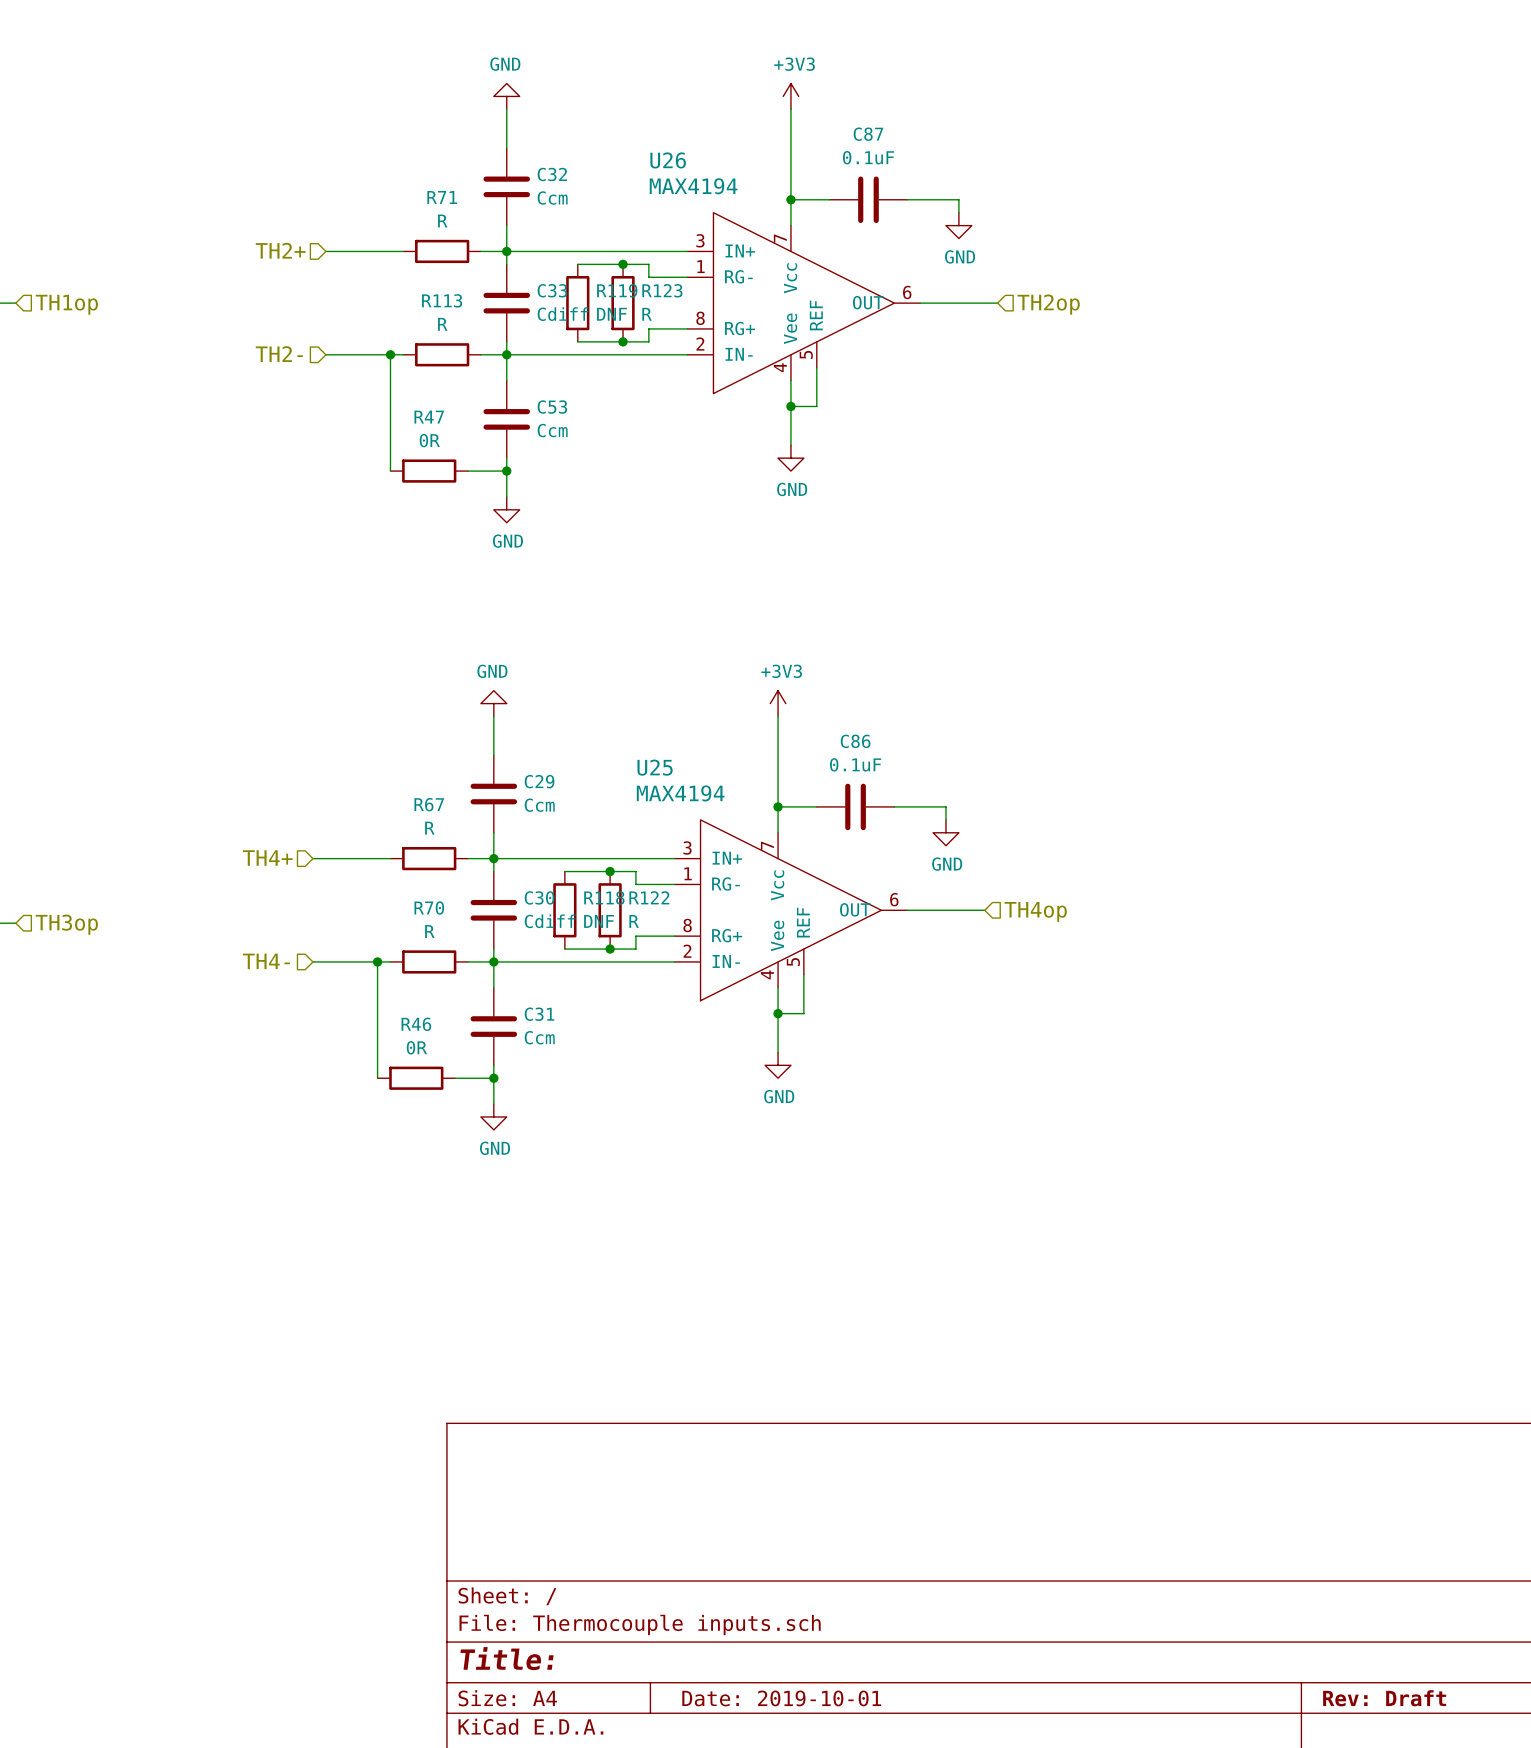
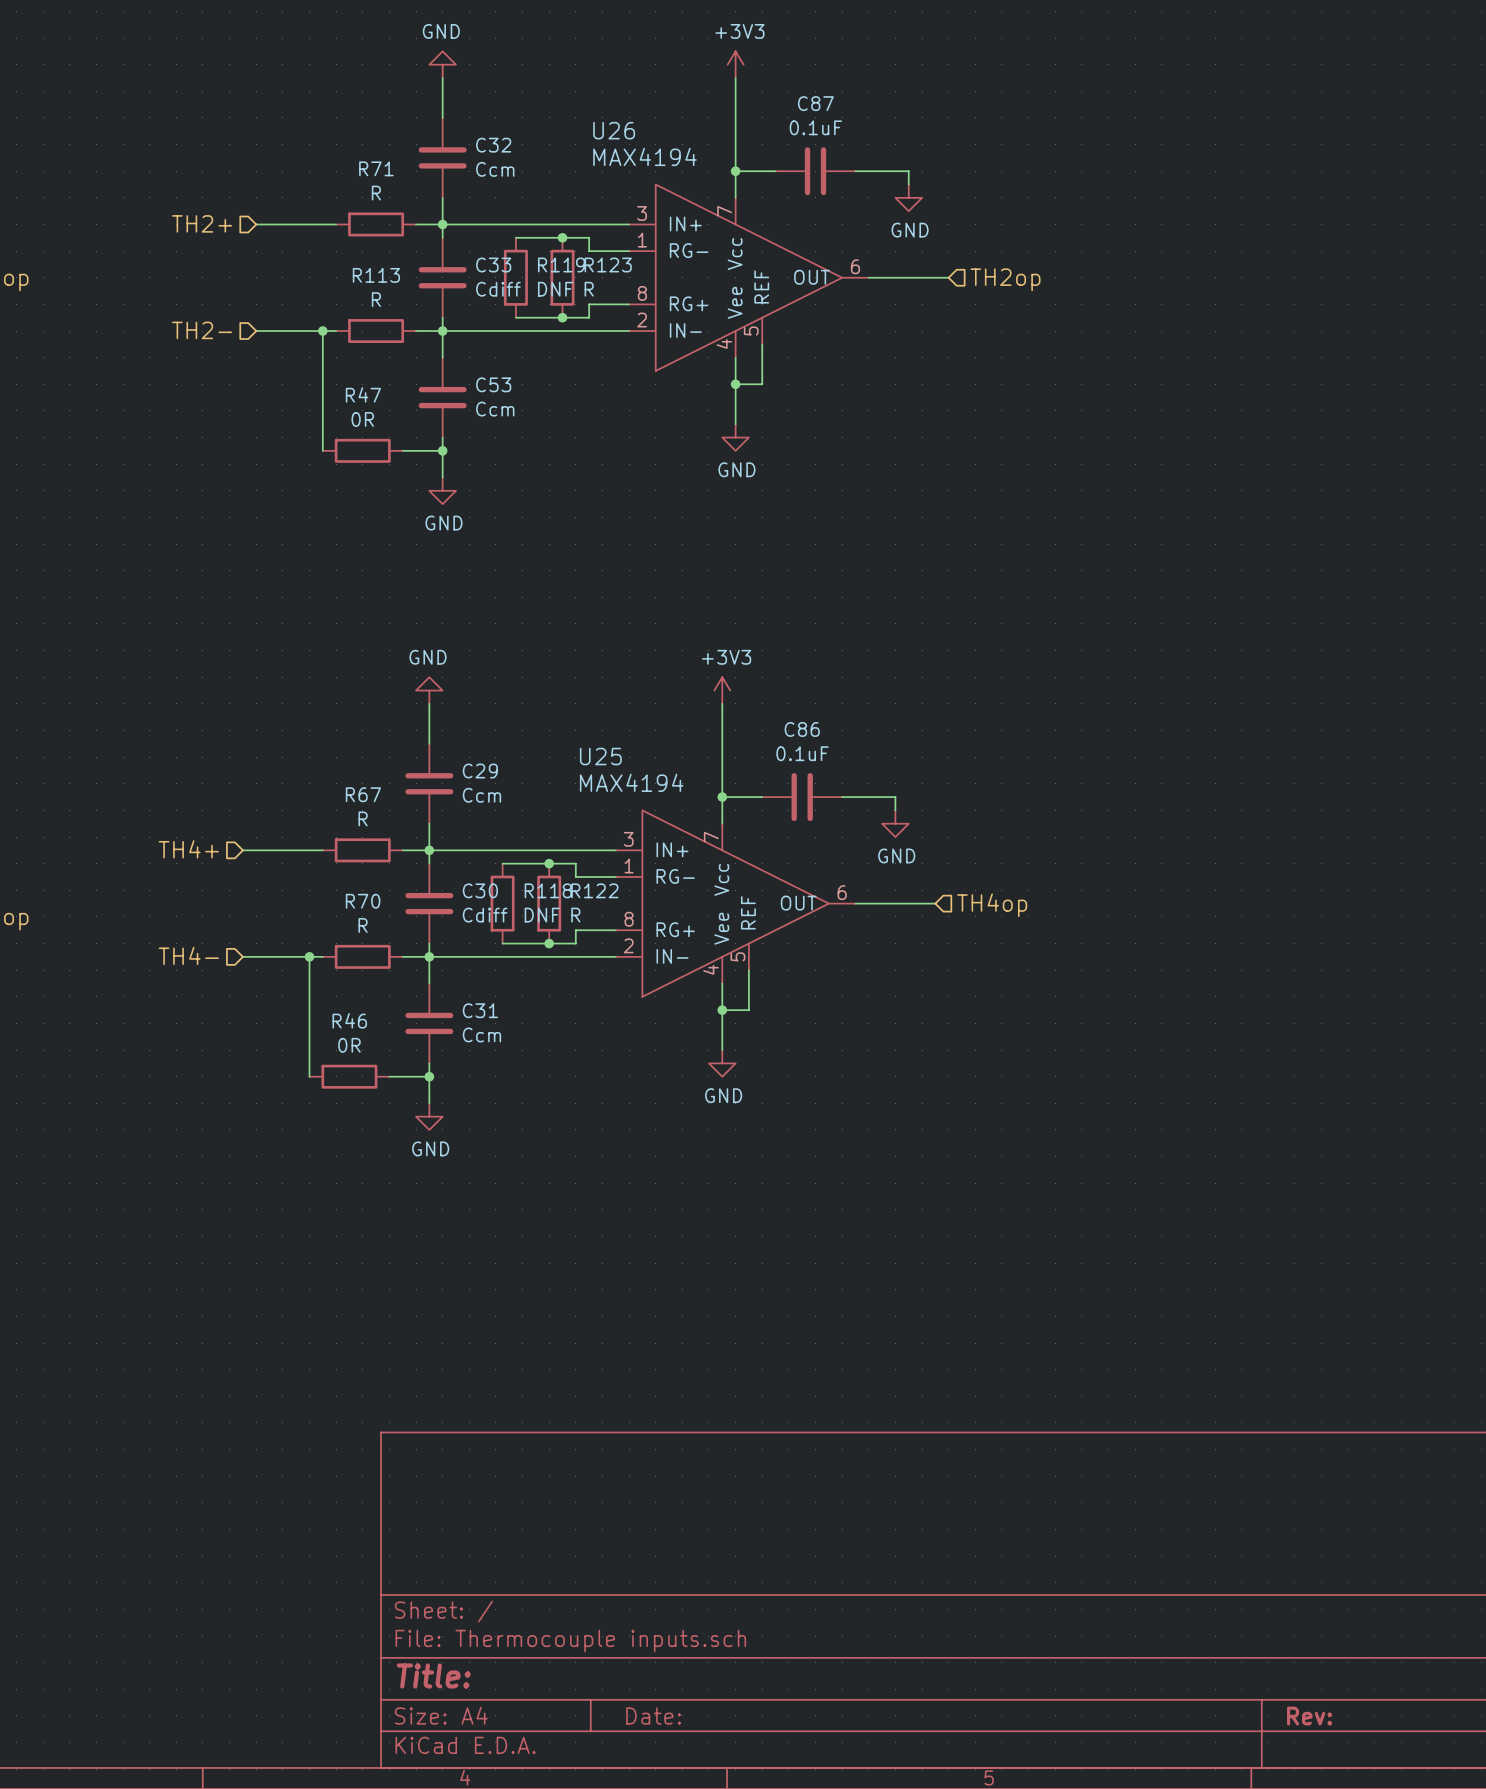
title block: Date: 2019-10-01 (781, 1698) -> Date: (653, 1716)
title block: Rev: Draft (1384, 1698) -> Rev: (1309, 1716)

